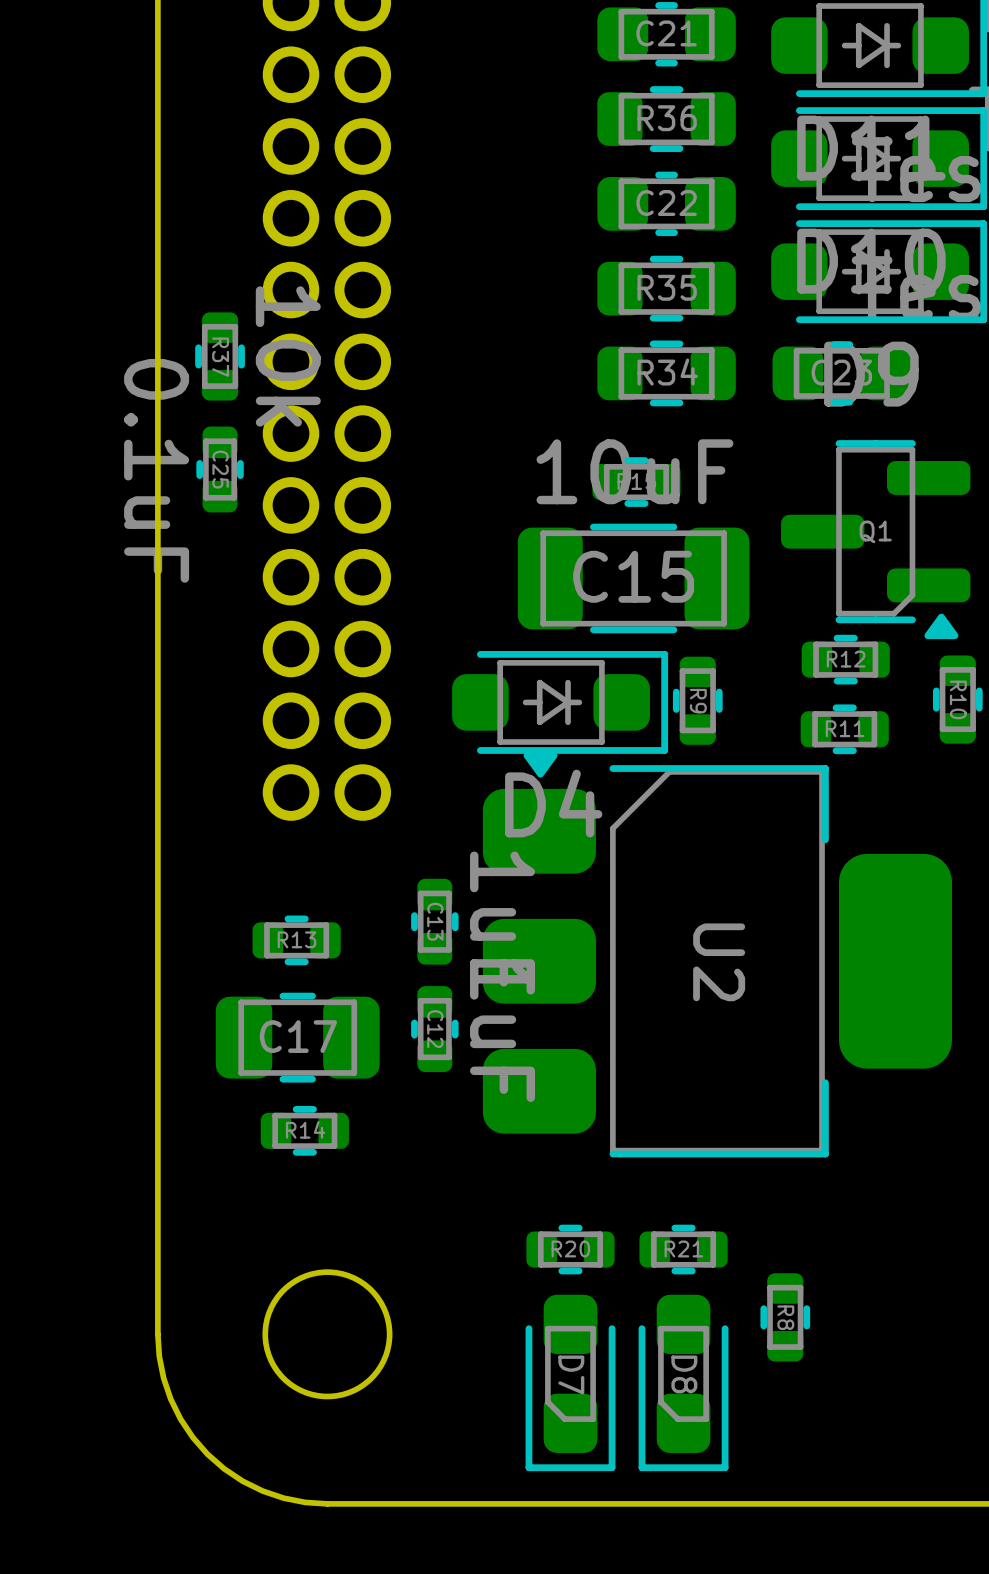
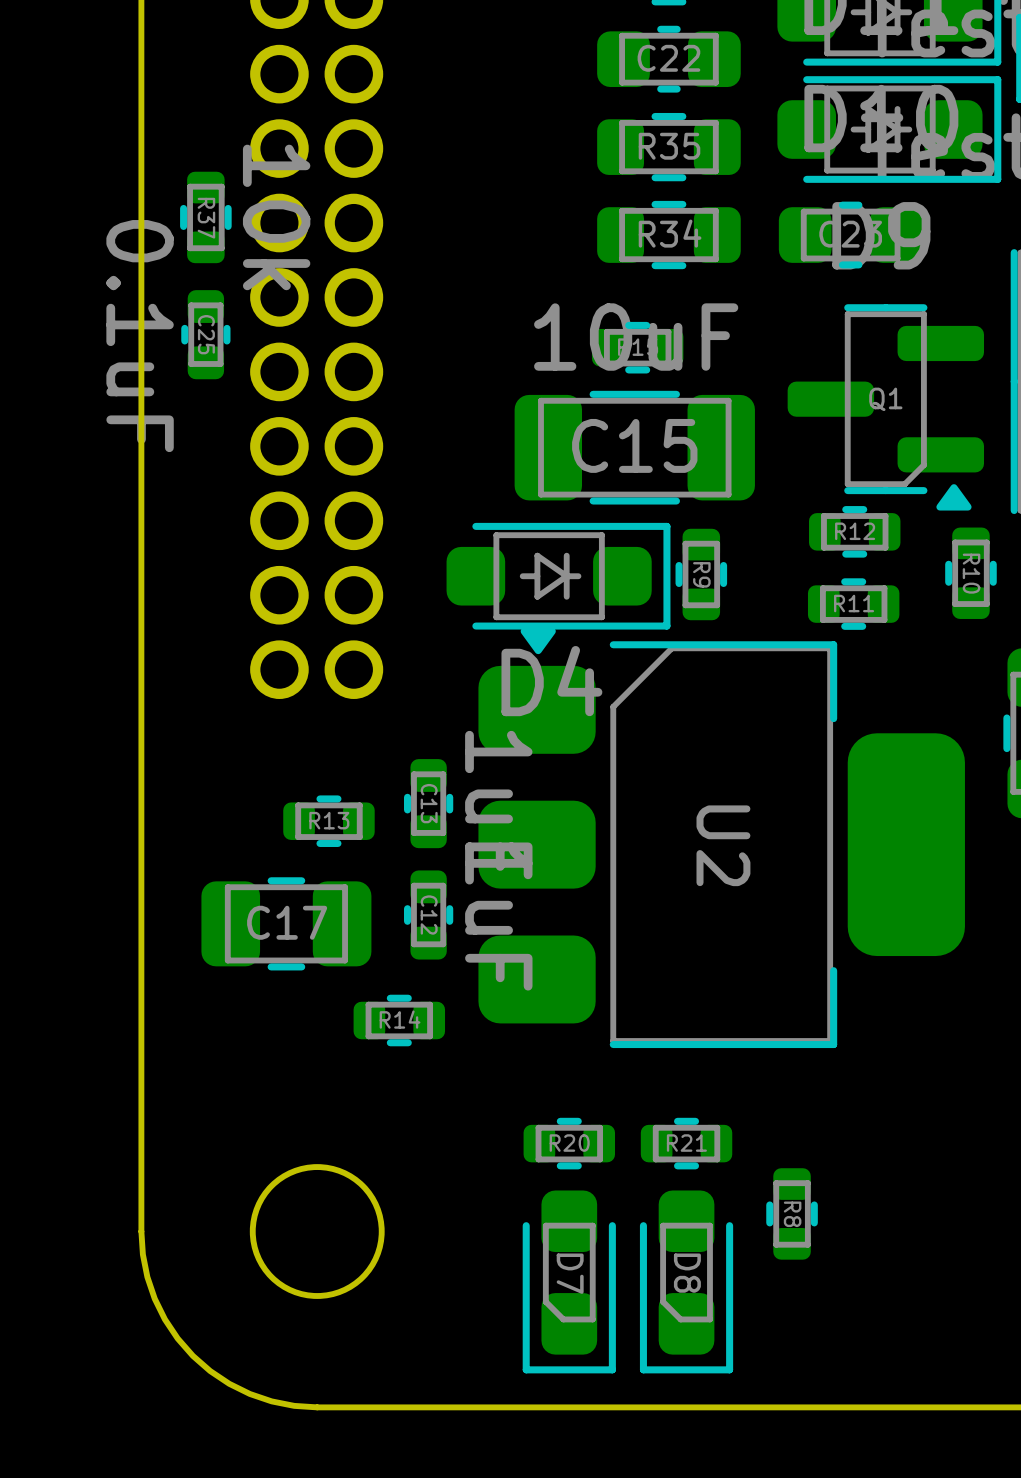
R13 position: (296, 940) -> (328, 821)
R14 position: (304, 1130) -> (399, 1020)

